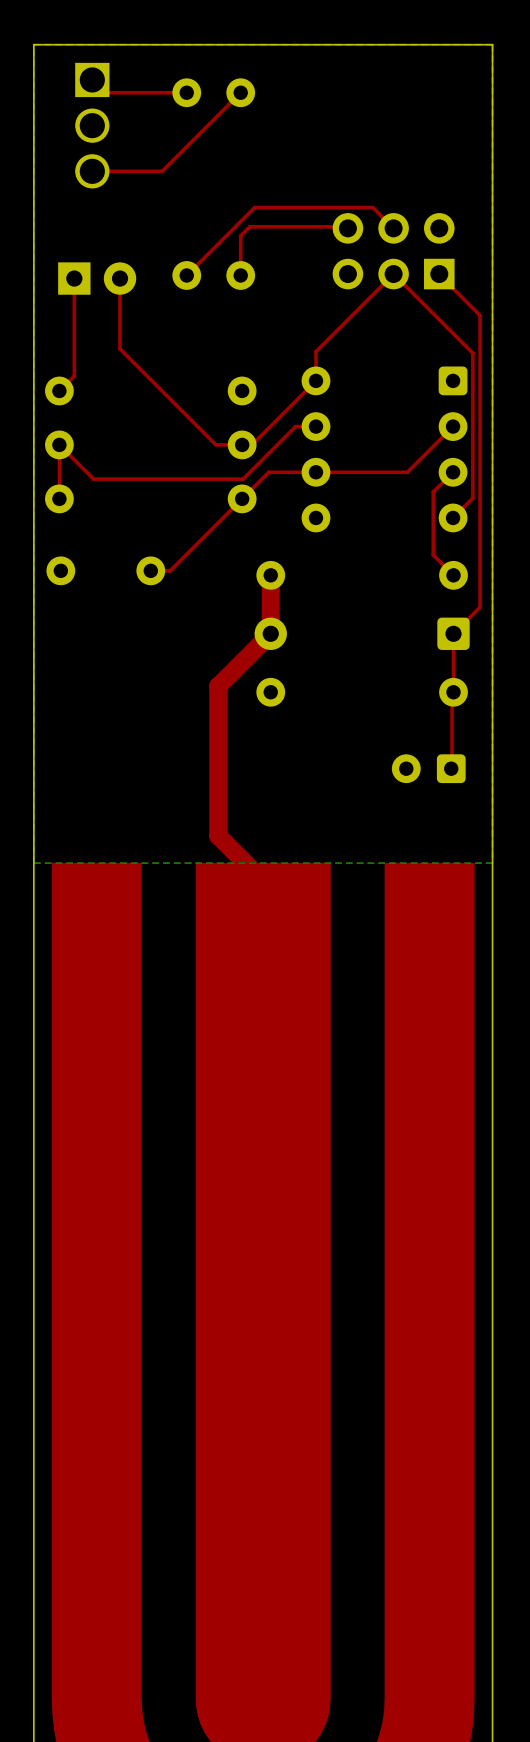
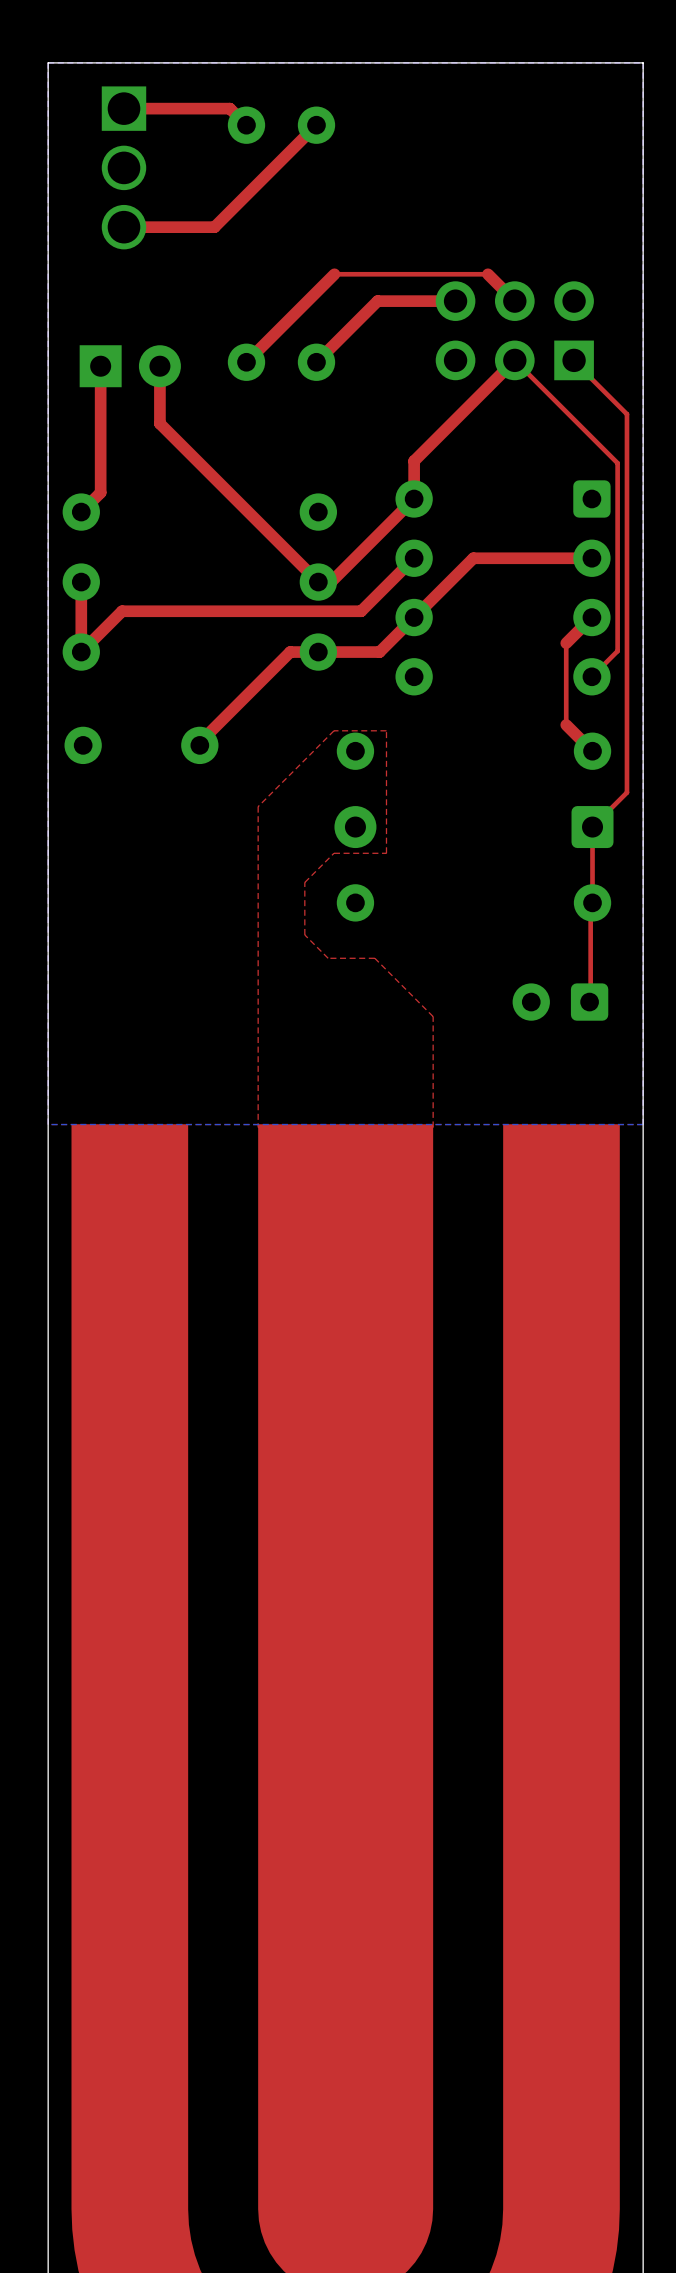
top track: (92, 79) (105, 92) (186, 92) -> (123, 108) (229, 108) (246, 125)
top track width: thin (240, 92) (162, 171) (92, 171) -> thick (316, 125) (214, 227) (123, 227)
top track width: thin (254, 207) (186, 275) -> thick (334, 274) (246, 362)
top track width: thin (372, 207) (393, 228) -> thick (487, 274) (514, 301)
top track: (347, 228) (346, 226) (249, 226) (240, 235) (240, 275) -> (455, 301) (377, 301) (316, 362)
top track width: thin (393, 274) (315, 351) (315, 380) (251, 444) (242, 444) -> thick (514, 360) (414, 461) (414, 498) (331, 582) (318, 582)
top track width: thin (74, 278) (74, 376) (59, 390) -> thick (100, 366) (100, 492) (81, 512)
top track width: thin (120, 278) (120, 322) -> thick (159, 366) (159, 423)
top track: (120, 322) (120, 348) (215, 444) (242, 444) -> (159, 423) (318, 582)
top track: (315, 426) (295, 426) (243, 479) (93, 479) (59, 444) -> (414, 558) (361, 611) (122, 611) (81, 652)
top track: (453, 426) (407, 472) (268, 472) (170, 570) (150, 570) -> (591, 558) (473, 558) (379, 652) (290, 652) (199, 742) (199, 745)
top track width: thin (59, 444) (59, 498) -> thick (81, 582) (81, 652)
top track width: thin (453, 472) (433, 492) -> thick (591, 617) (566, 643)
top track width: thin (433, 555) (453, 575) -> thick (566, 724) (592, 751)
top zone outline: none -> (386, 730) (386, 853) (333, 853) (304, 882) (304, 934) (328, 958) (374, 958) (433, 1016) (433, 1127) (258, 1127) (258, 806) (333, 730) (386, 730)
top track: (270, 575) (270, 633) (218, 686) (218, 835) (263, 880) -> none

